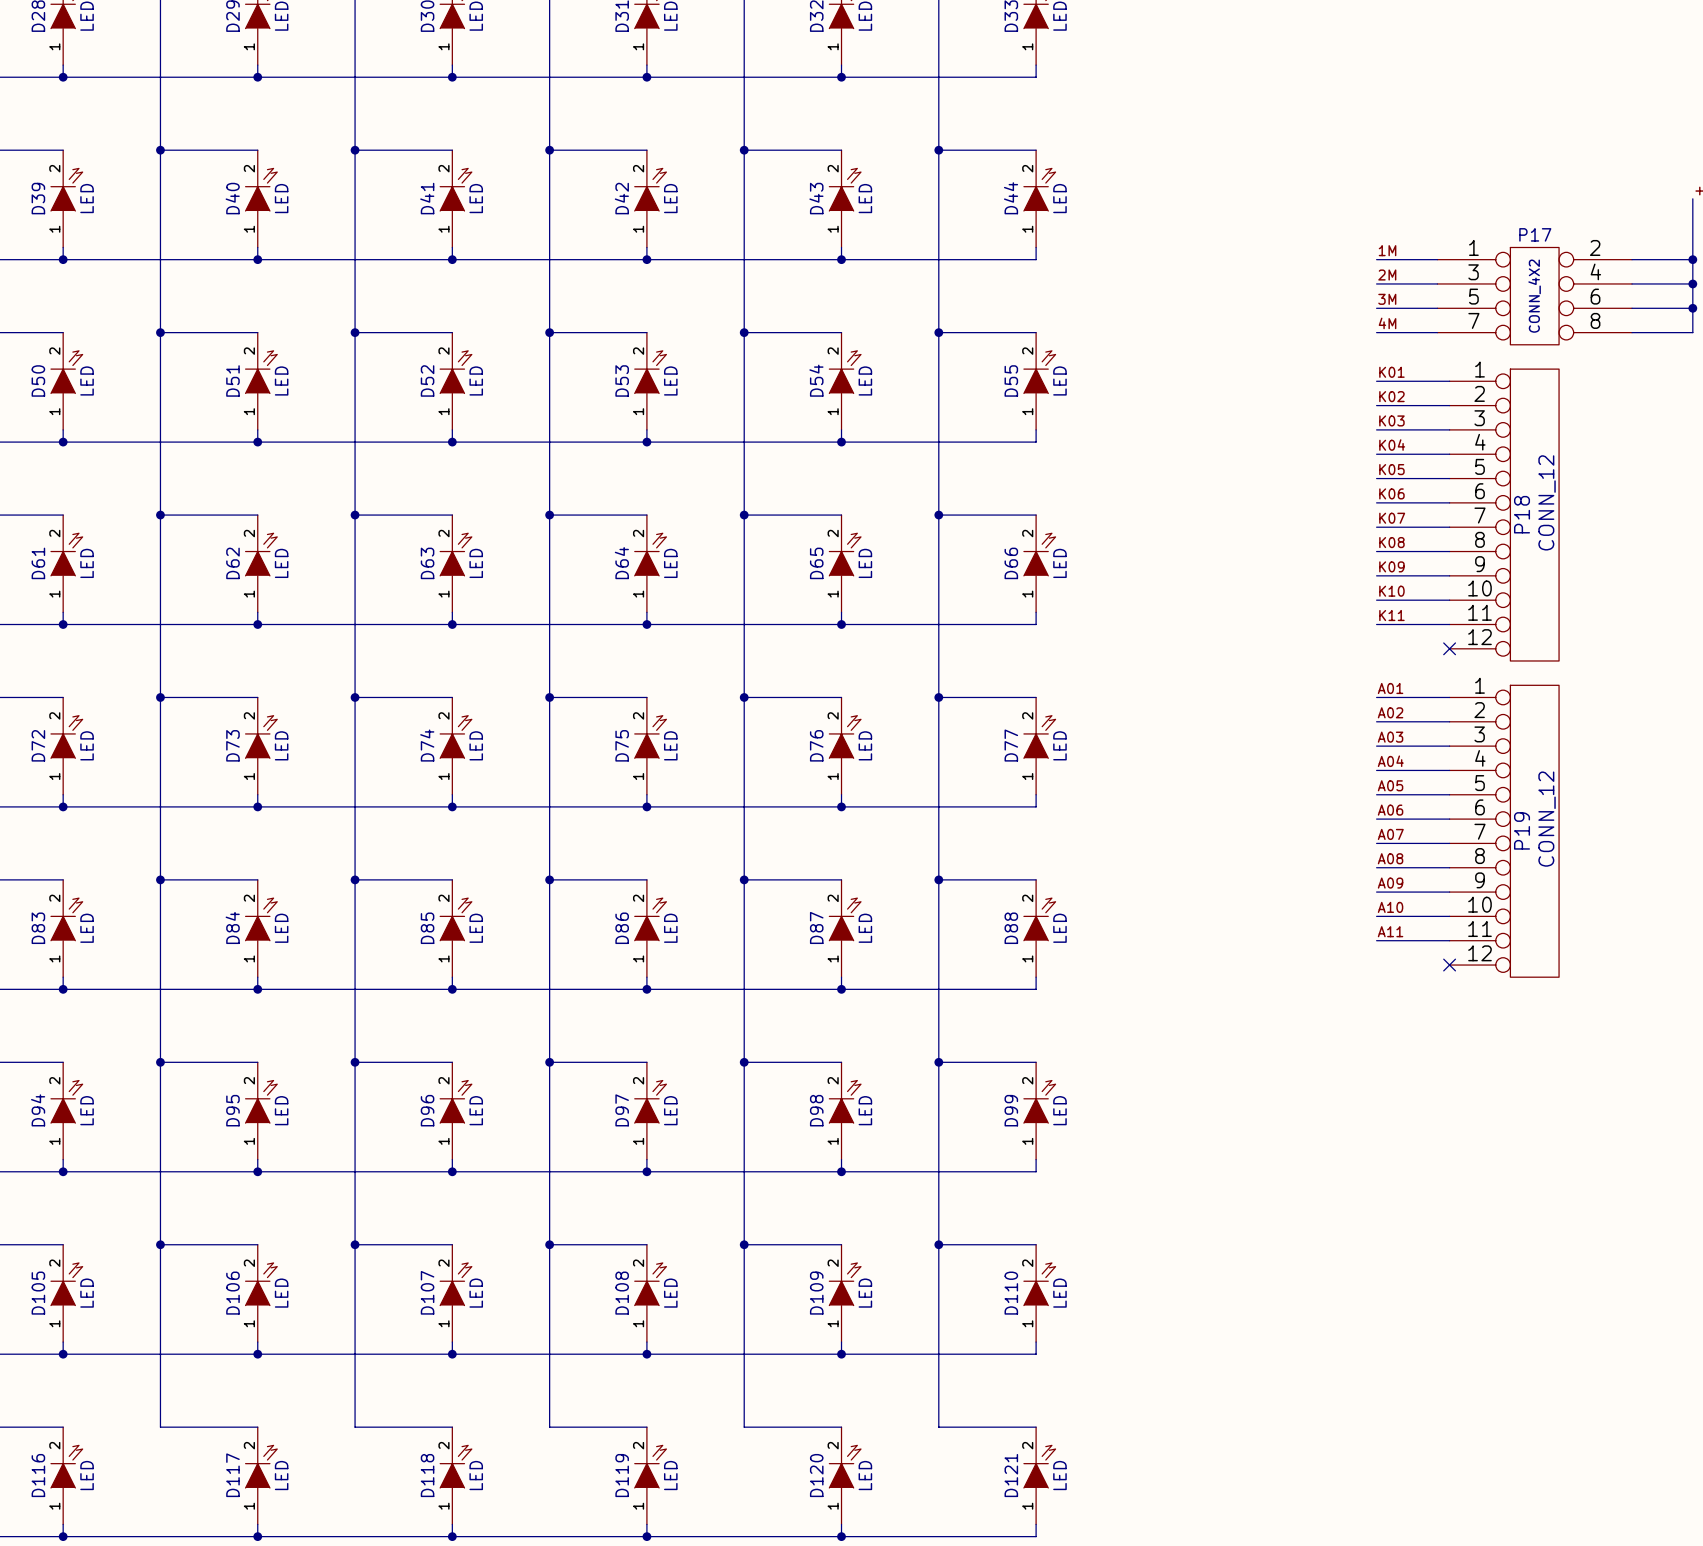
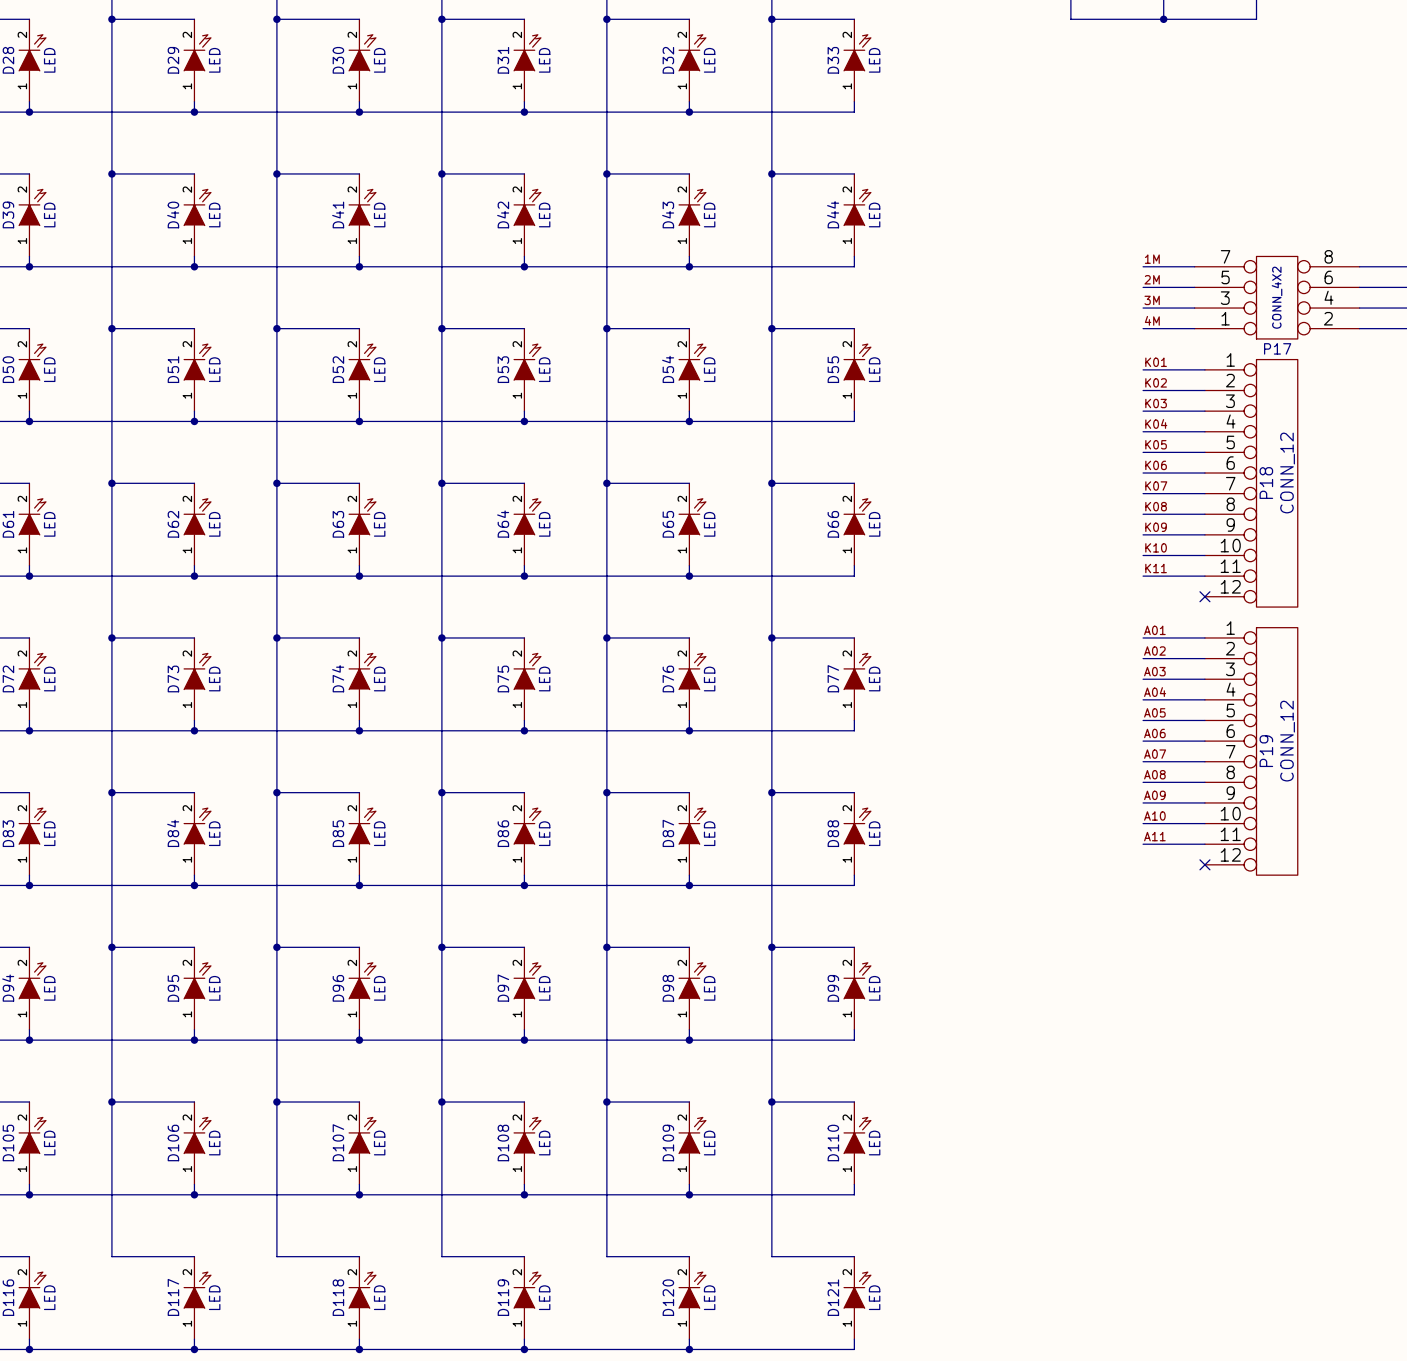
P17 flip: as is (1534, 296) -> up-down (1277, 297)

